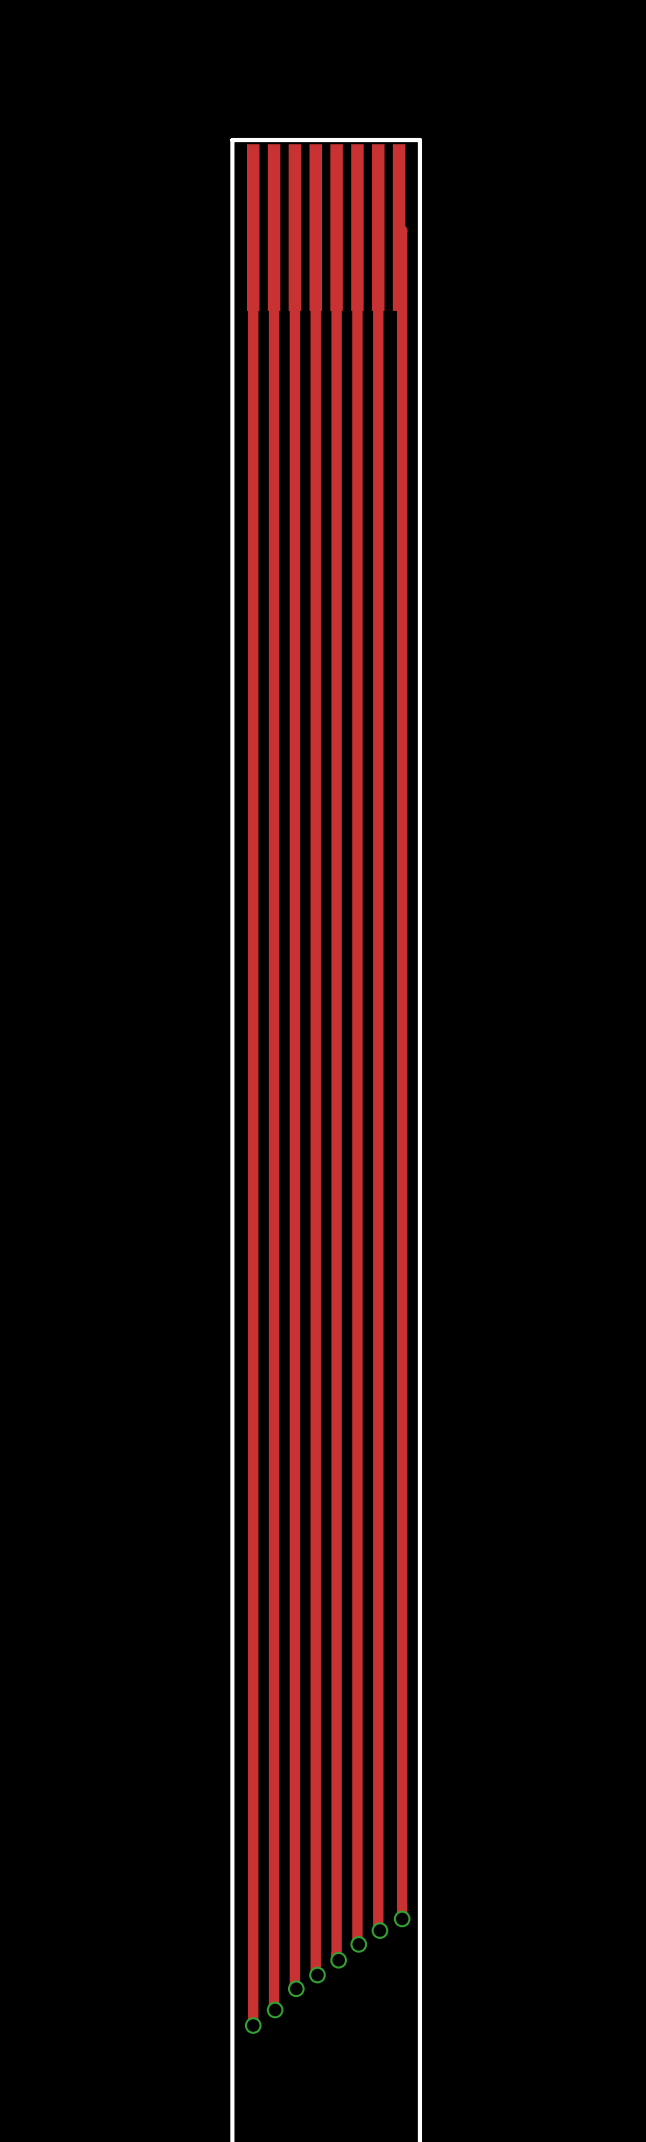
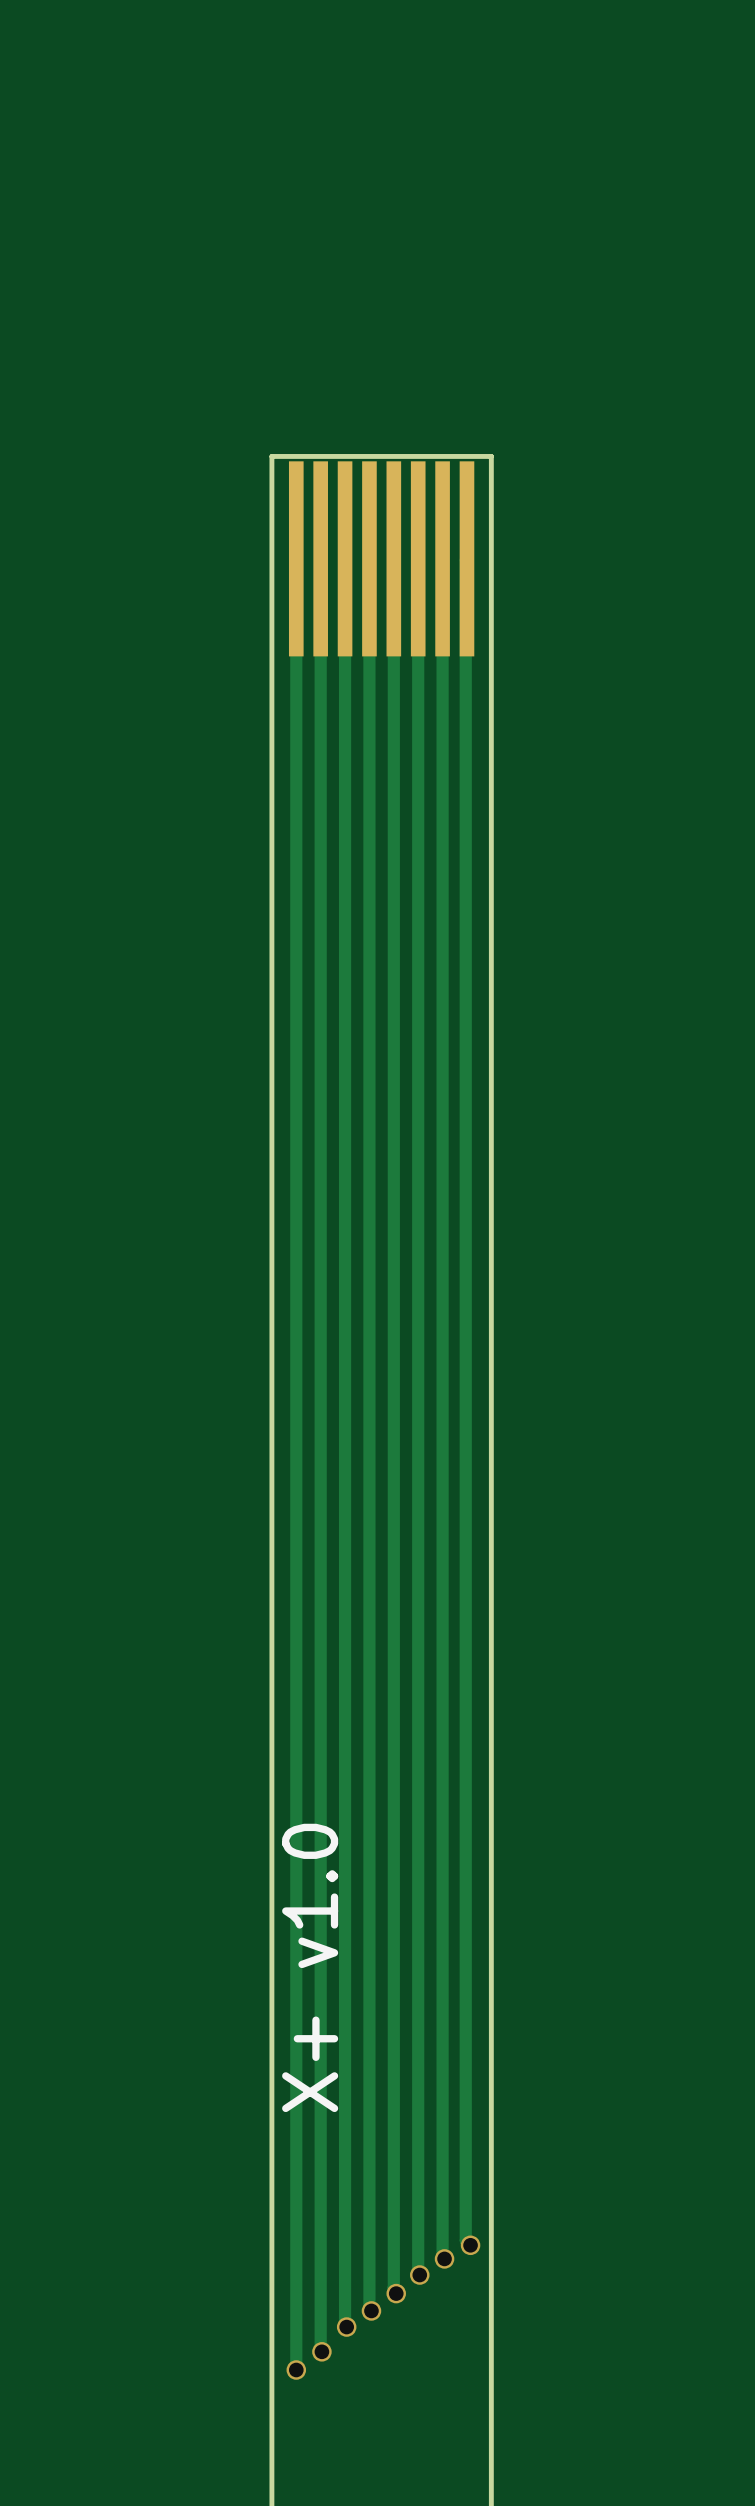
track: (253, 227) (253, 477) -> none
track: (274, 227) (274, 477) -> none
track: (294, 227) (294, 477) -> none
track: (315, 227) (315, 477) -> none
part position: (326, 227) -> (381, 558)
track: (336, 227) (336, 477) -> none
track: (357, 227) (357, 477) -> none
track: (378, 227) (378, 477) -> none
track: (399, 227) (402, 230) (402, 1918) -> (466, 558) (465, 2240) (470, 2245)
board edge: (232, 390) (232, 140) (419, 140) (419, 390) -> (271, 456) (491, 456)
text: none -> X+ v1.0 (310, 1967)

